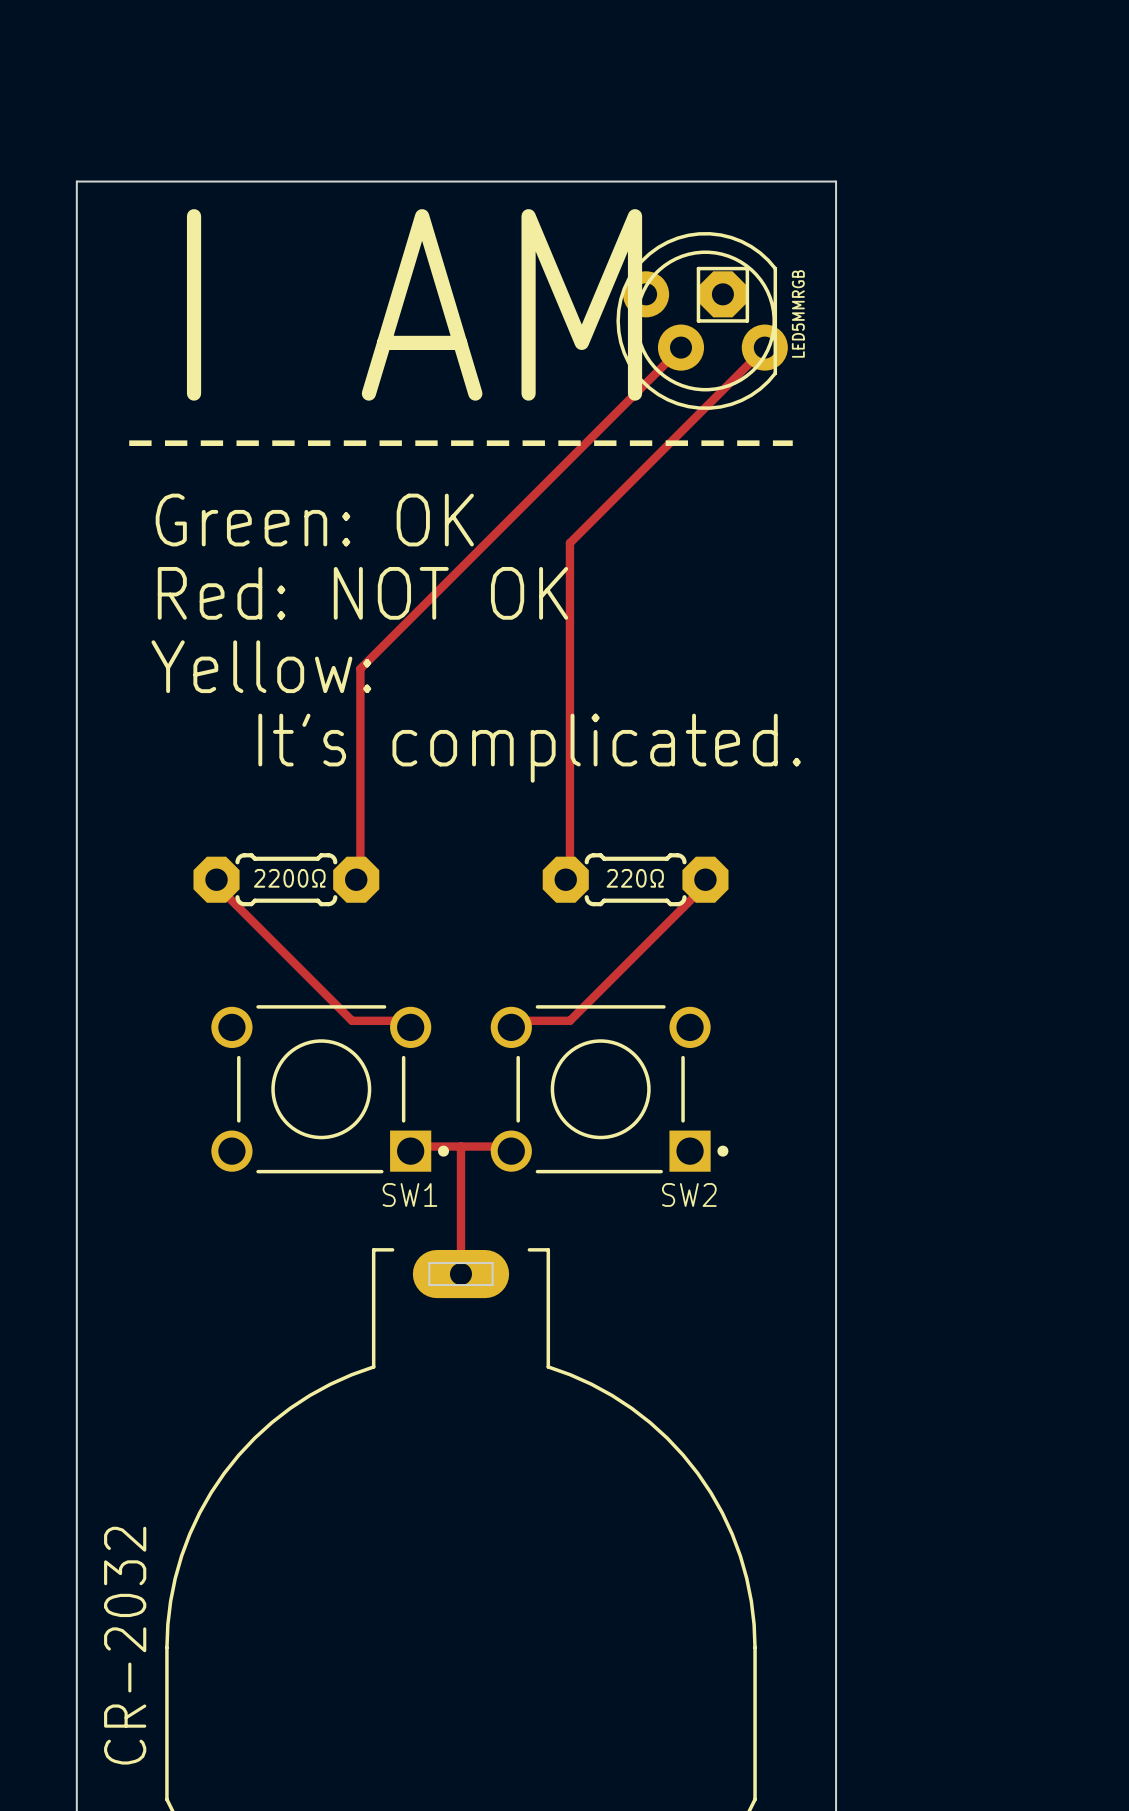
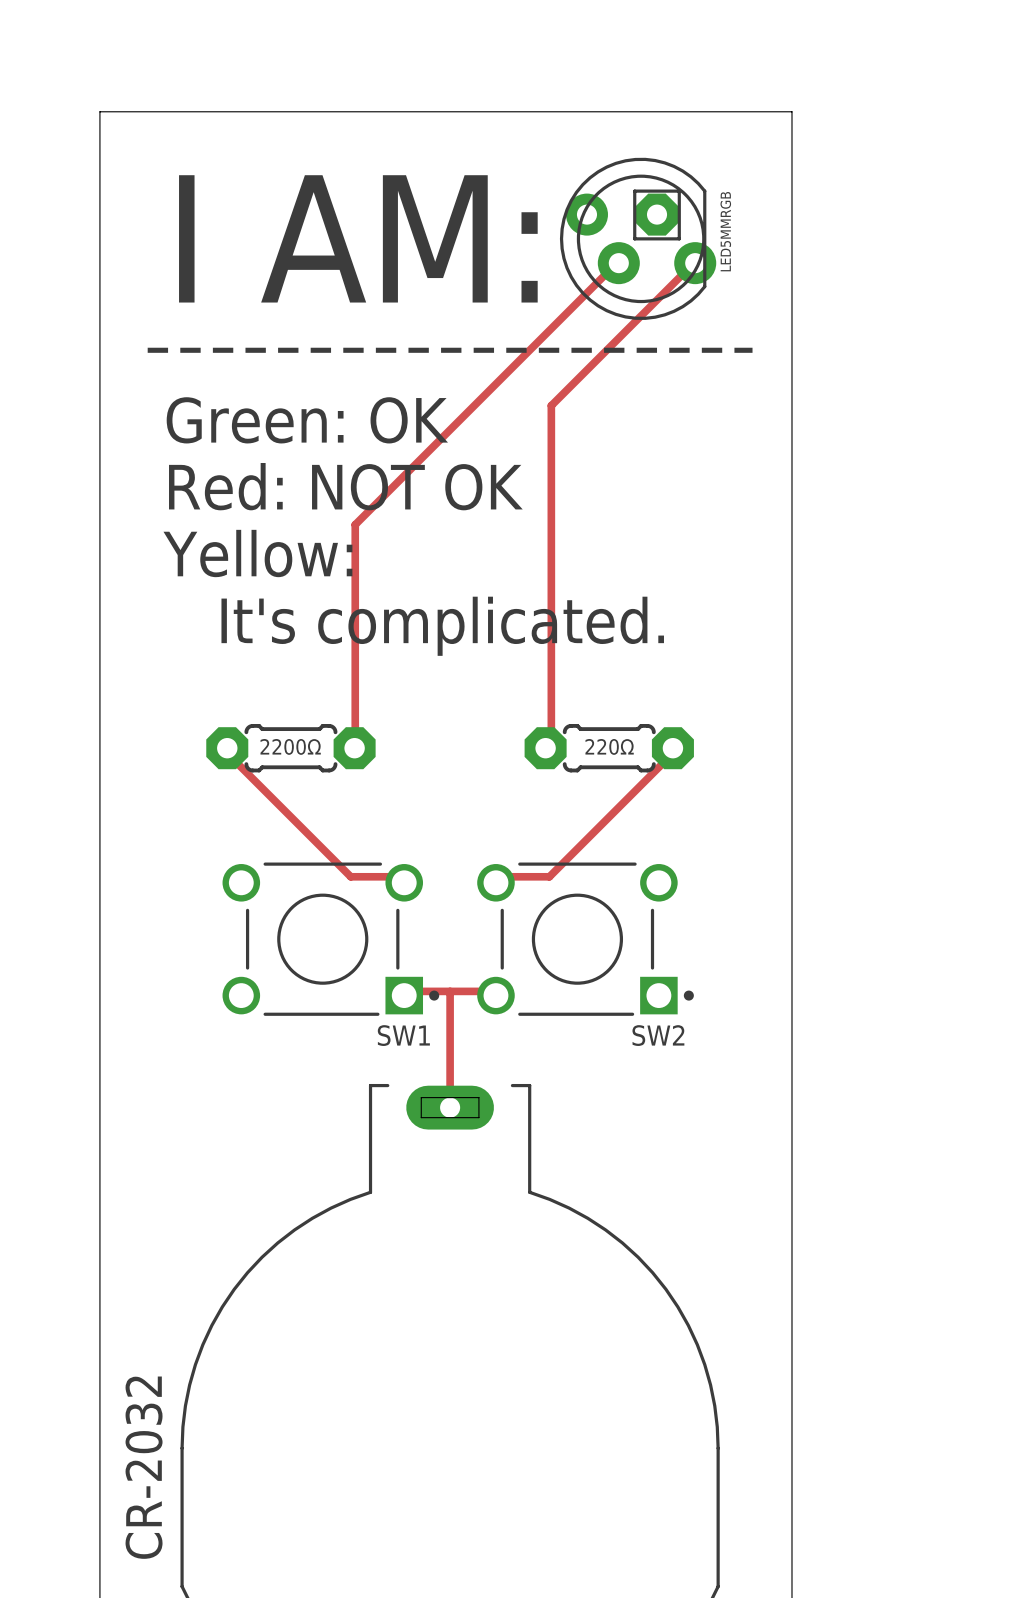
text: I AM (414, 304) -> I AM: (358, 238)
LED5MMRGB position: (702, 320) -> (638, 238)
track: (681, 347) (360, 668) (360, 878) (356, 879) -> (618, 263) (355, 524) (354, 748)
track: (764, 347) (569, 543) (569, 878) (565, 879) -> (695, 263) (551, 405) (551, 741) (545, 748)

